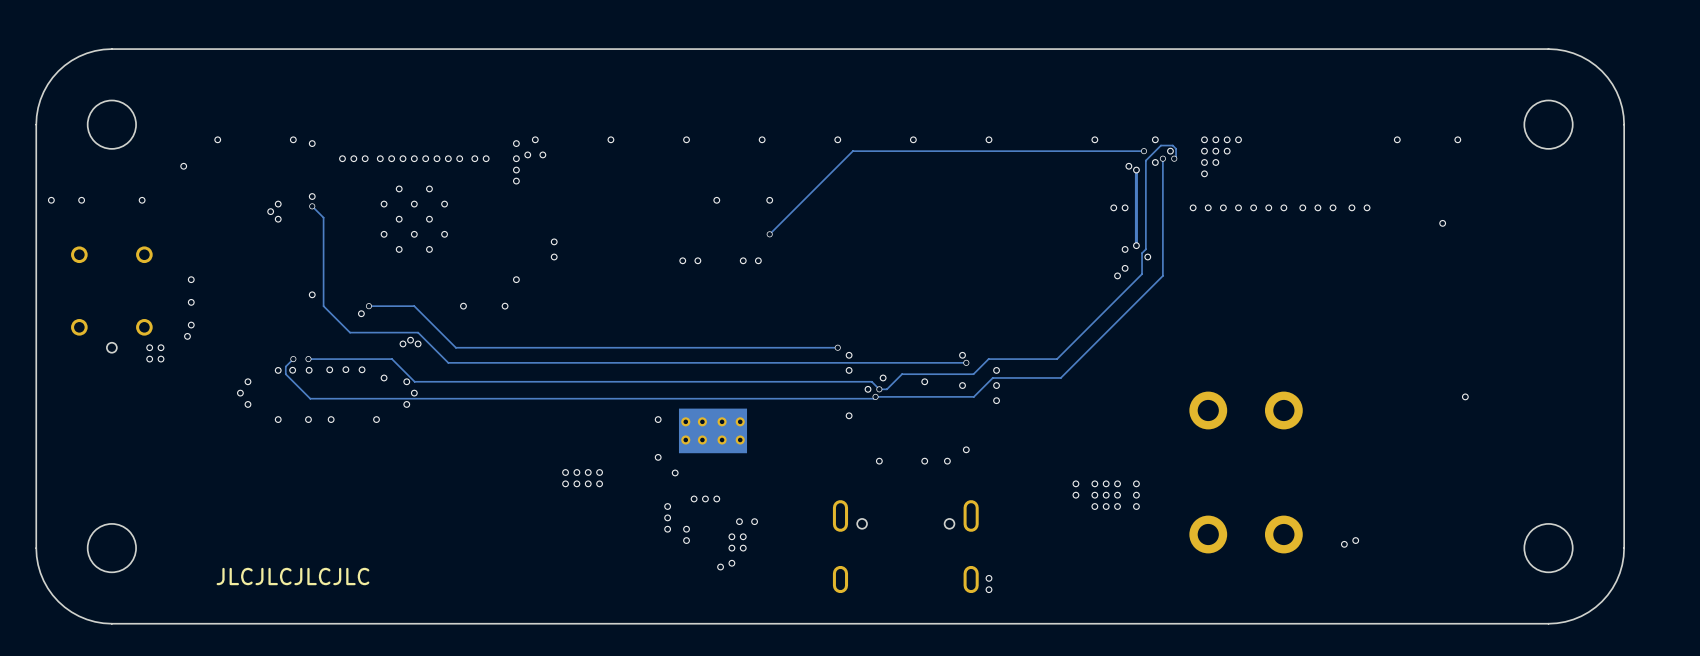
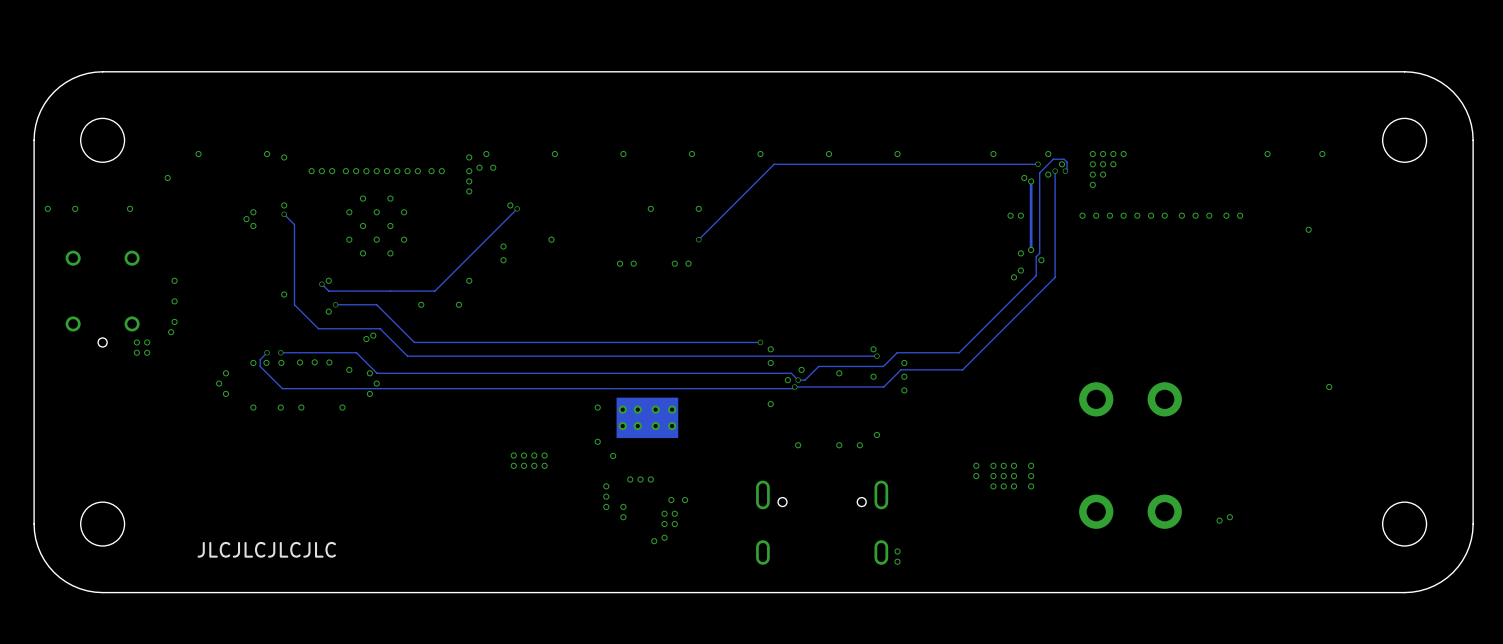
via: none -> (510, 205)
track: none -> (517, 208) (434, 291) (328, 291) (321, 284)
via: none -> (517, 208)
via: none -> (551, 239)
via: none -> (321, 284)
via position: (418, 343) -> (328, 280)

